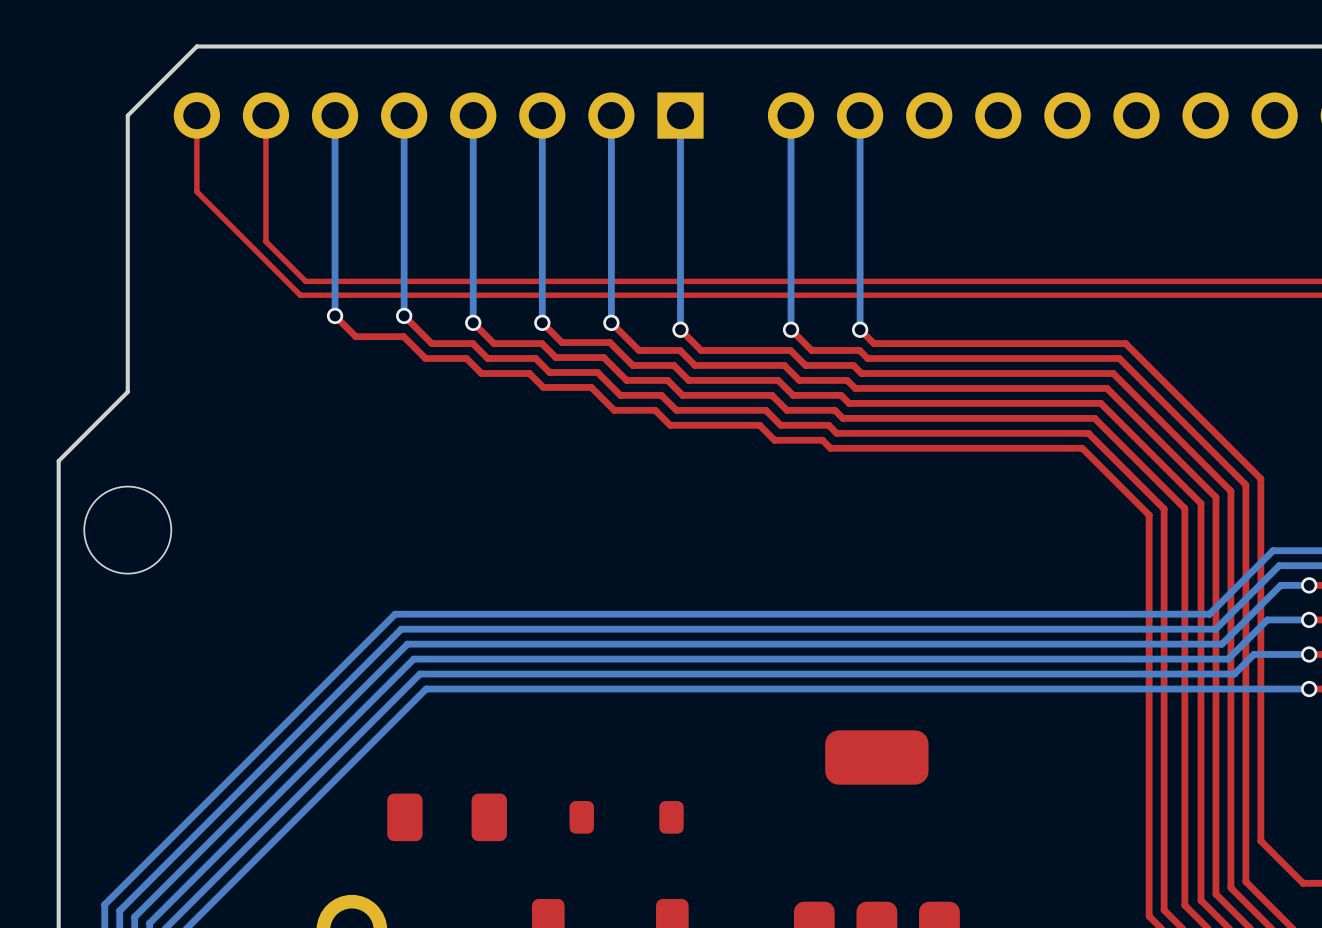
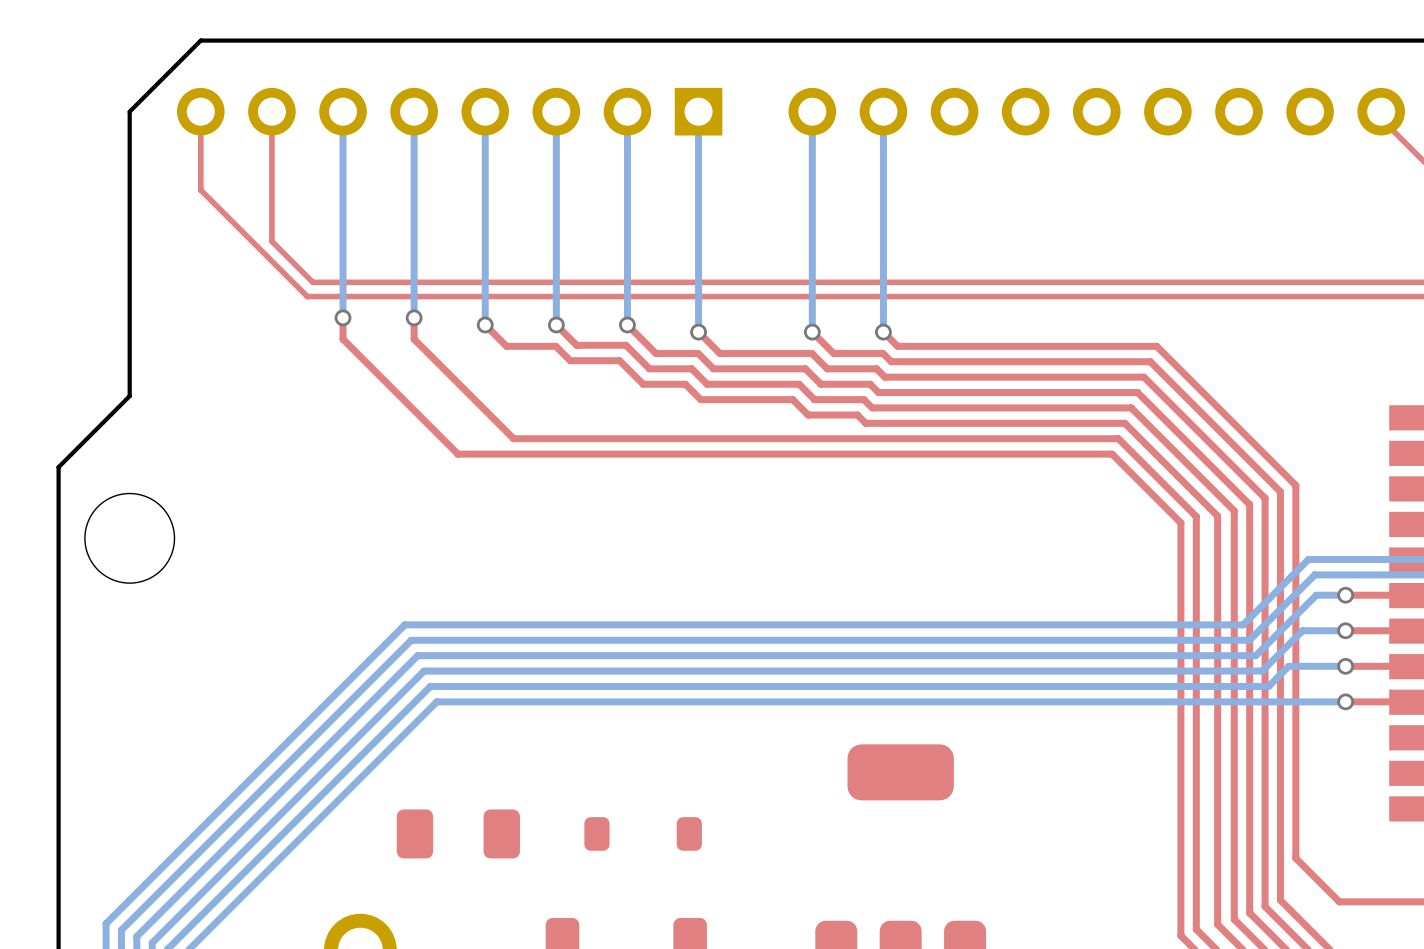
top track: (335, 315) (355, 336) (403, 336) (425, 358) (466, 358) (481, 373) (529, 373) (543, 387) (591, 387) (614, 410) (655, 410) (670, 425) (759, 425) (774, 440) (822, 440) (830, 448) -> (343, 317) (343, 339) (457, 454) (853, 454)
top track: (404, 315) (431, 343) (472, 343) (487, 358) (535, 358) (549, 372) (597, 372) (620, 395) (661, 395) (676, 410) (765, 410) (780, 425) (828, 425) (836, 433) -> (414, 317) (414, 339) (513, 438) (859, 438)

